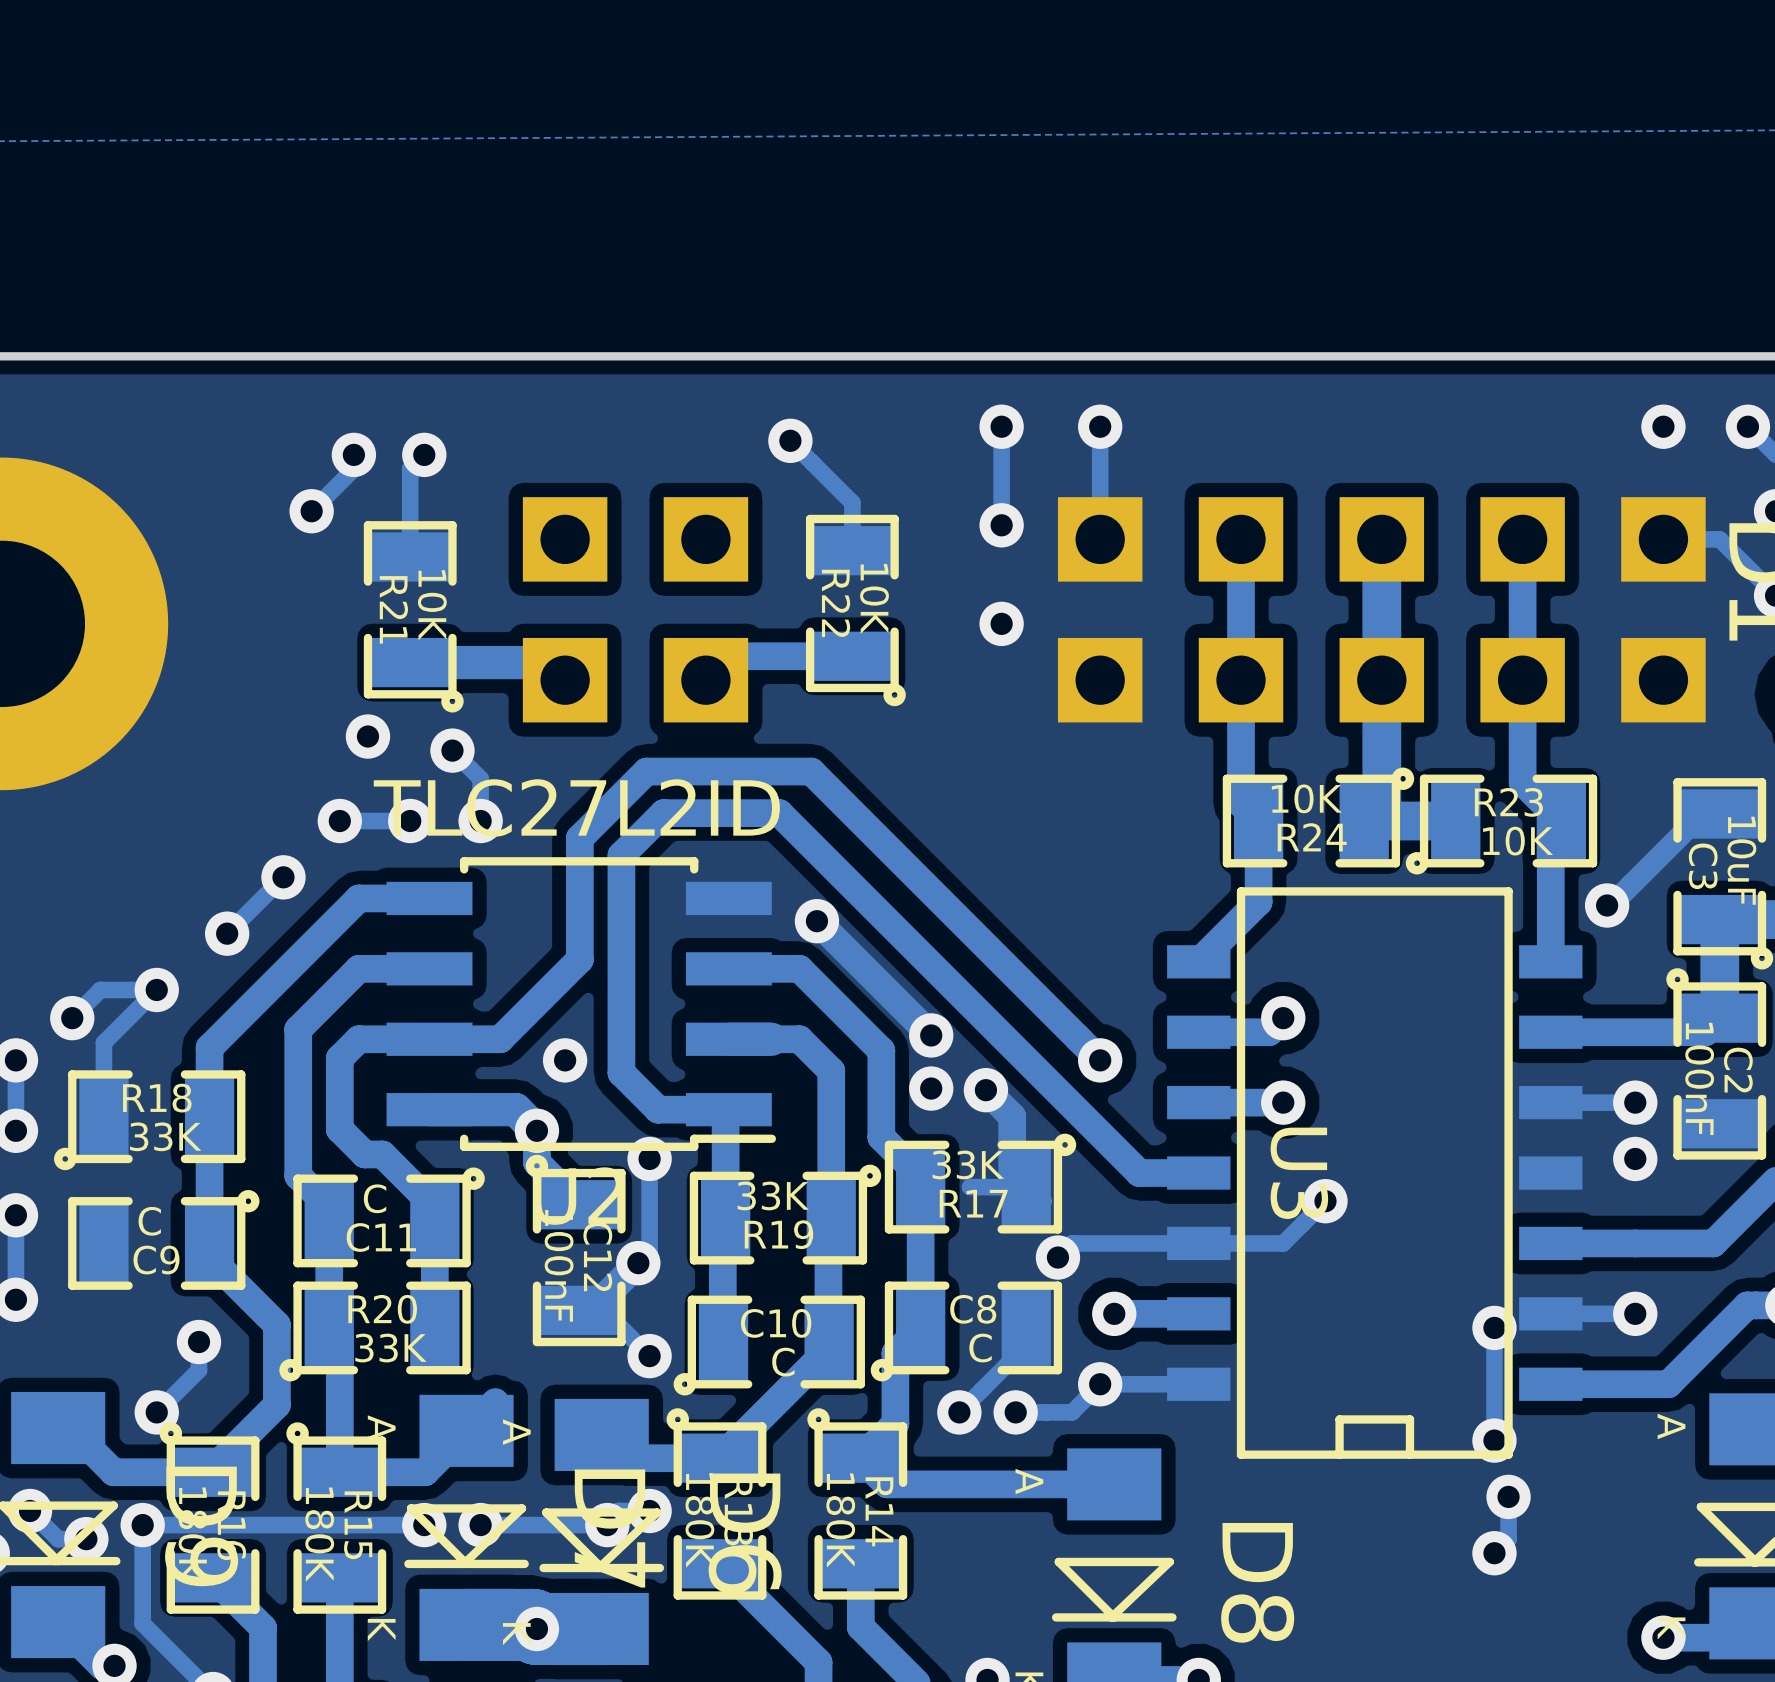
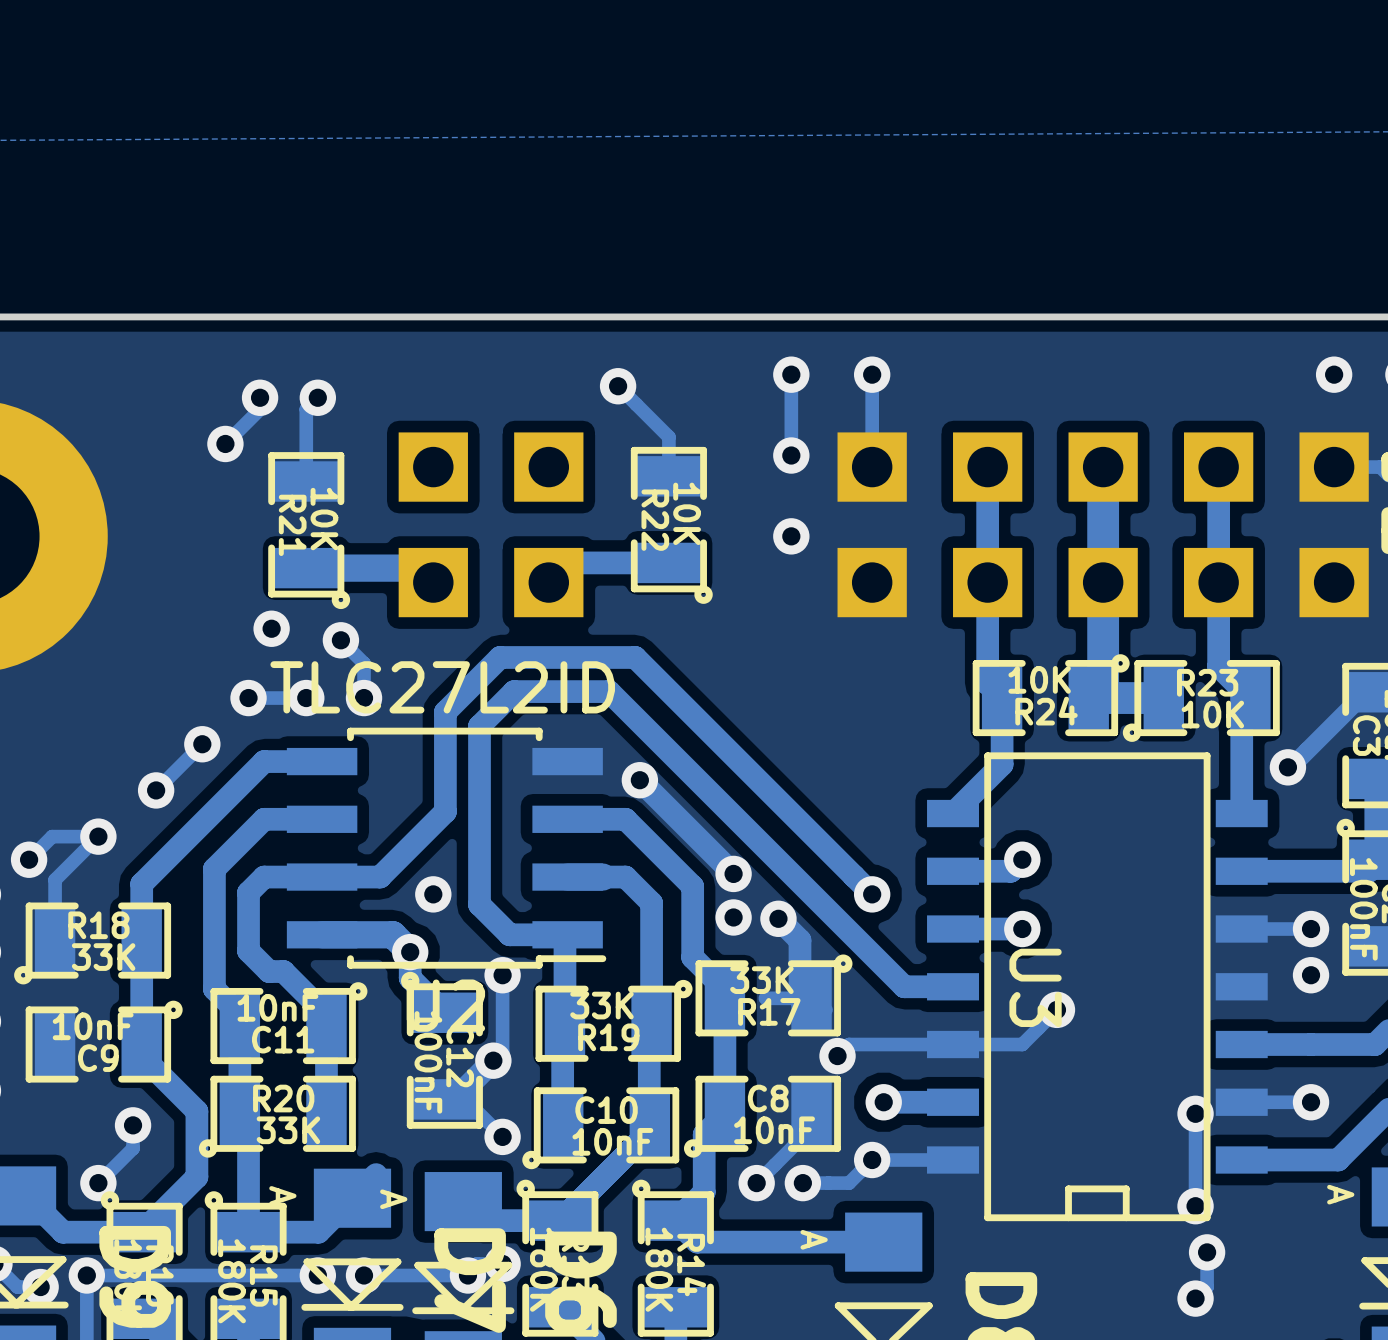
C11 value: C (375, 1198) -> 10nF (277, 1007)
C9 value: C (149, 1221) -> 10nF (93, 1026)
C8 value: C (980, 1348) -> 10nF (774, 1130)
C10 value: C (783, 1362) -> 10nF (612, 1141)

